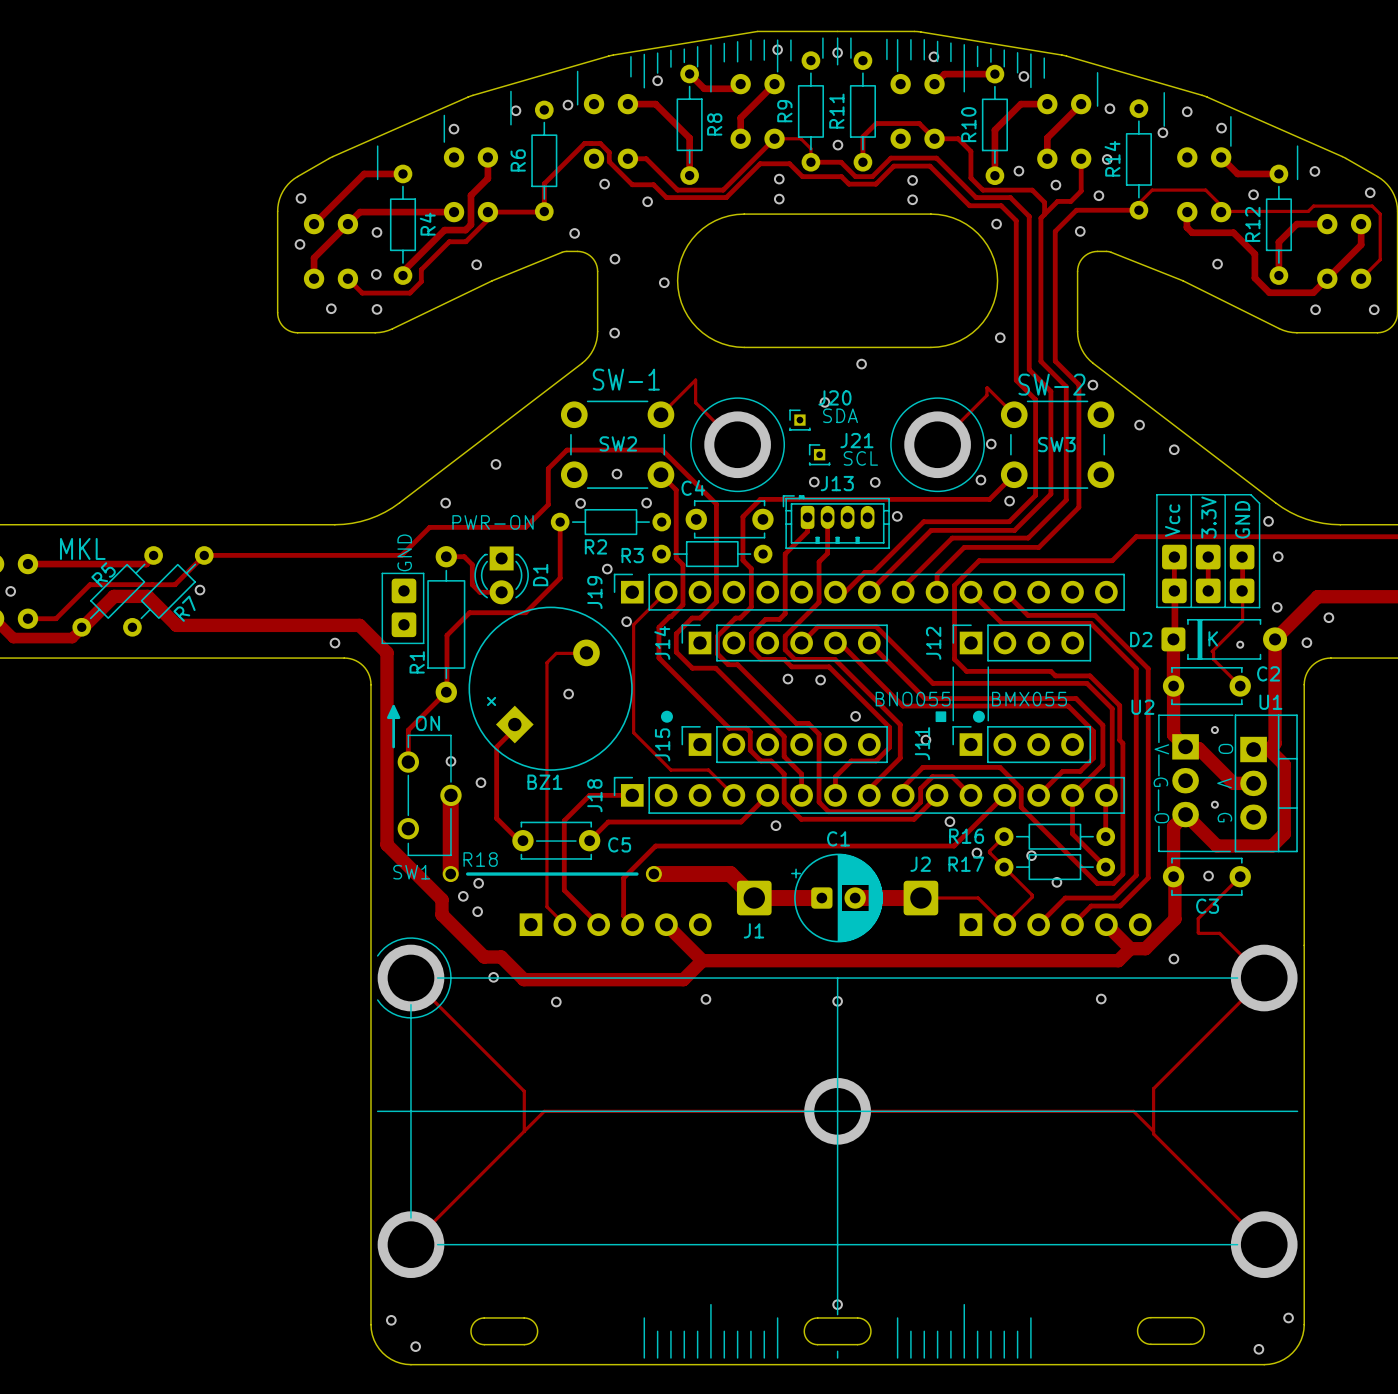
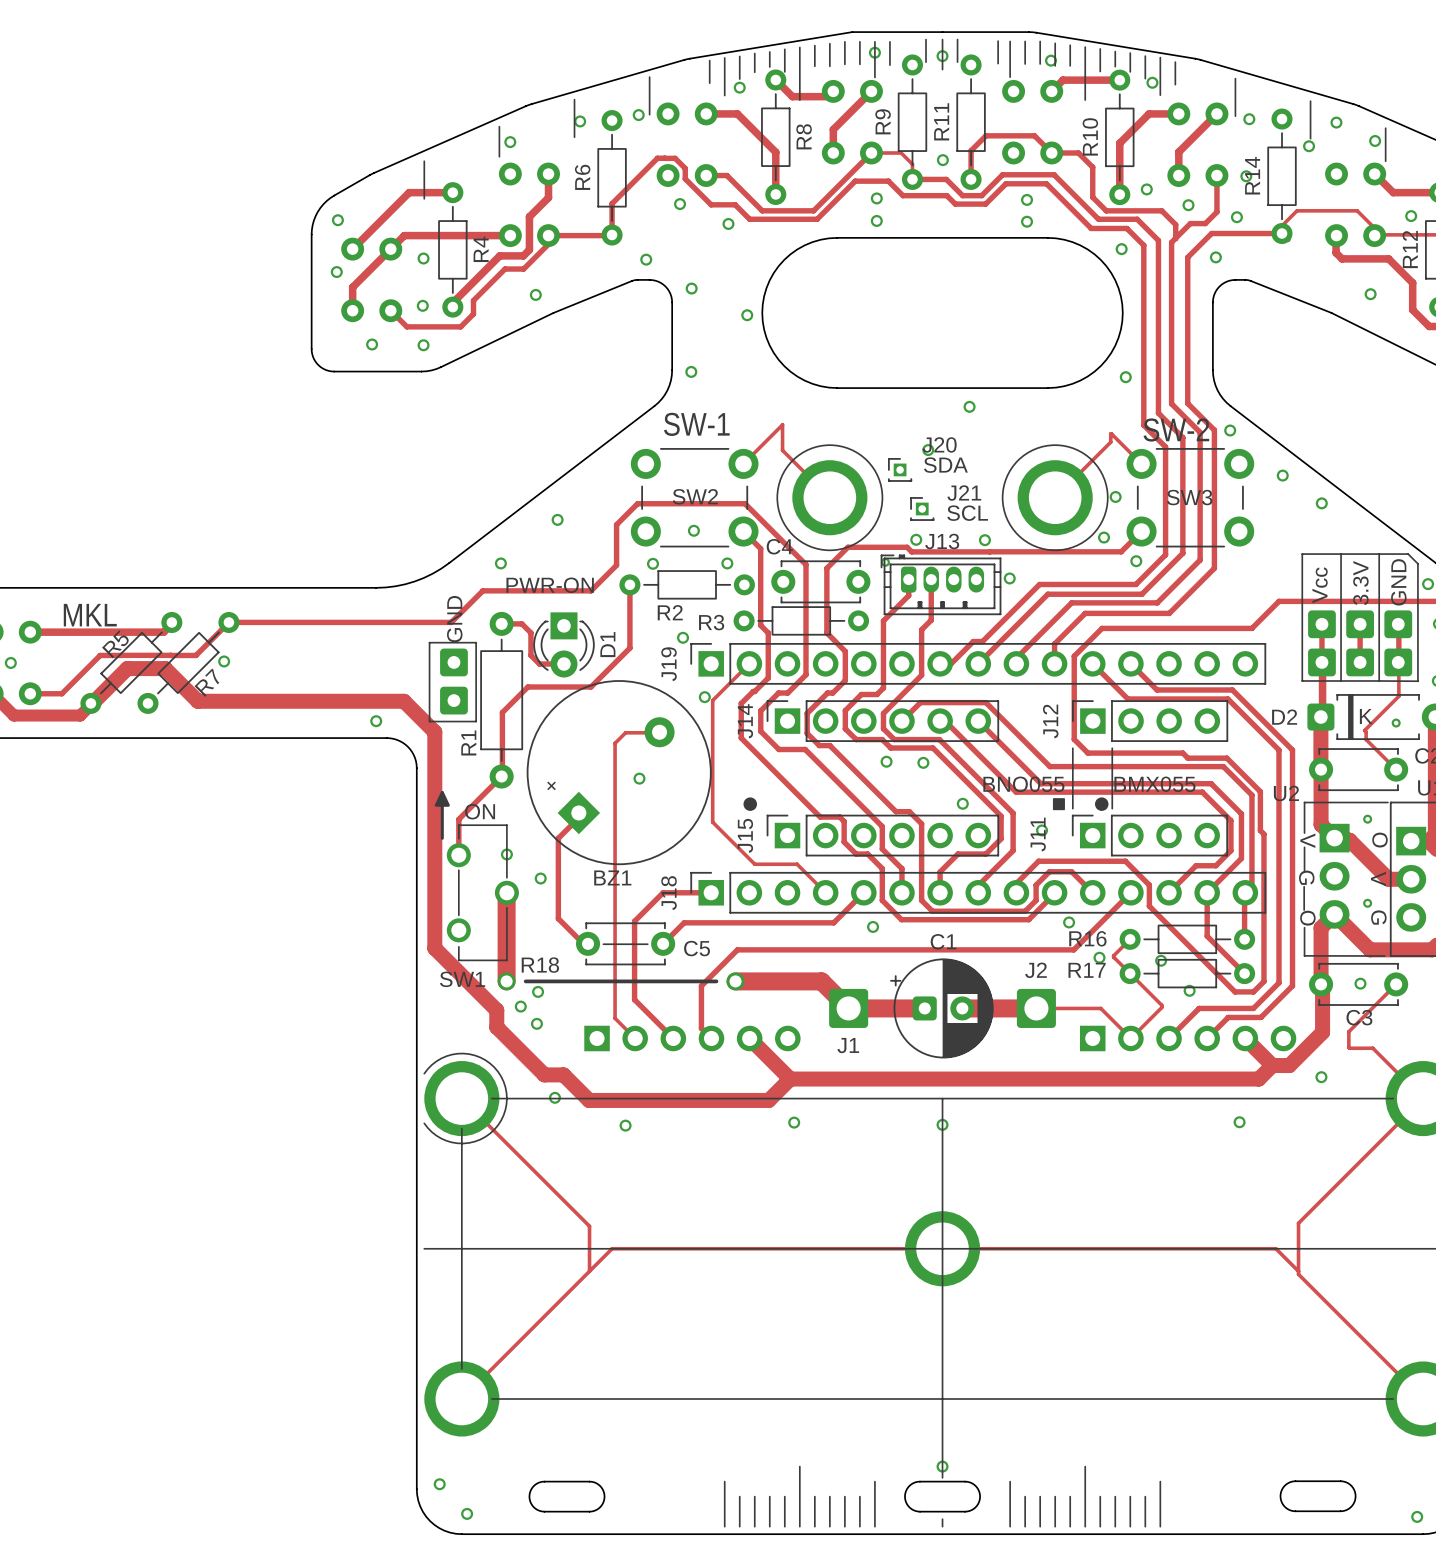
track: none -> (989, 551) (1121, 551)
track: (996, 492) (989, 499) (760, 499) (742, 516) (742, 560) (751, 568) (751, 581) -> (989, 551) (911, 551) (907, 547) (847, 547) (826, 568) (826, 632) (845, 651)
via: none -> (885, 562)

